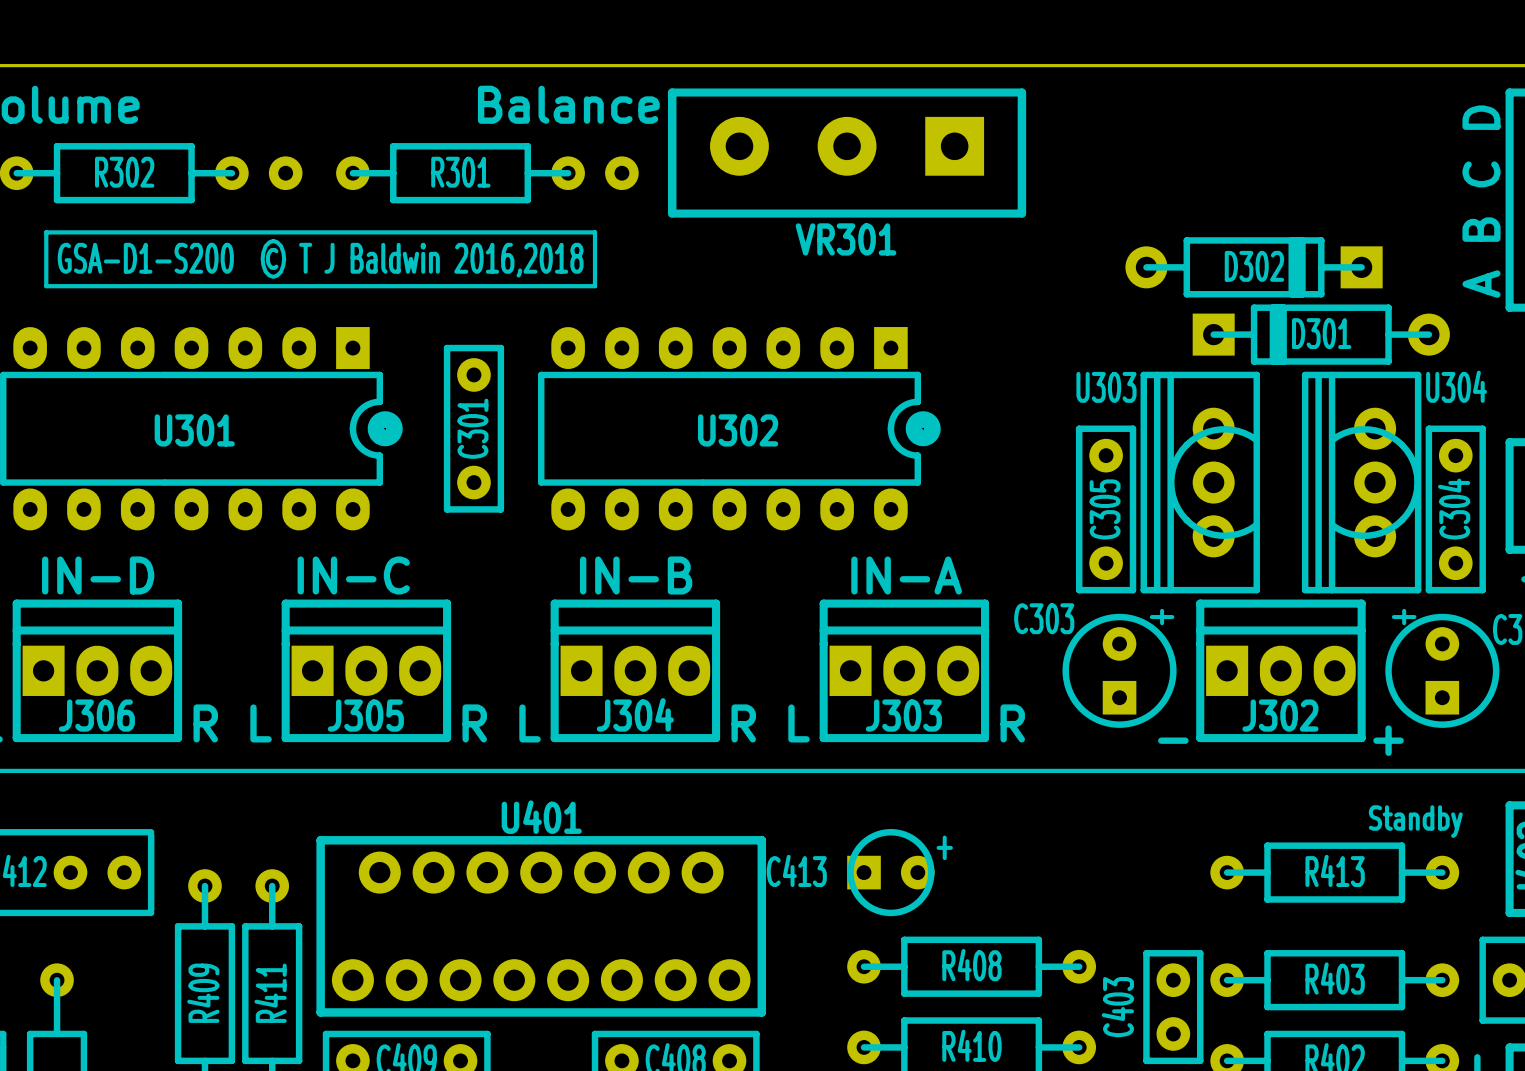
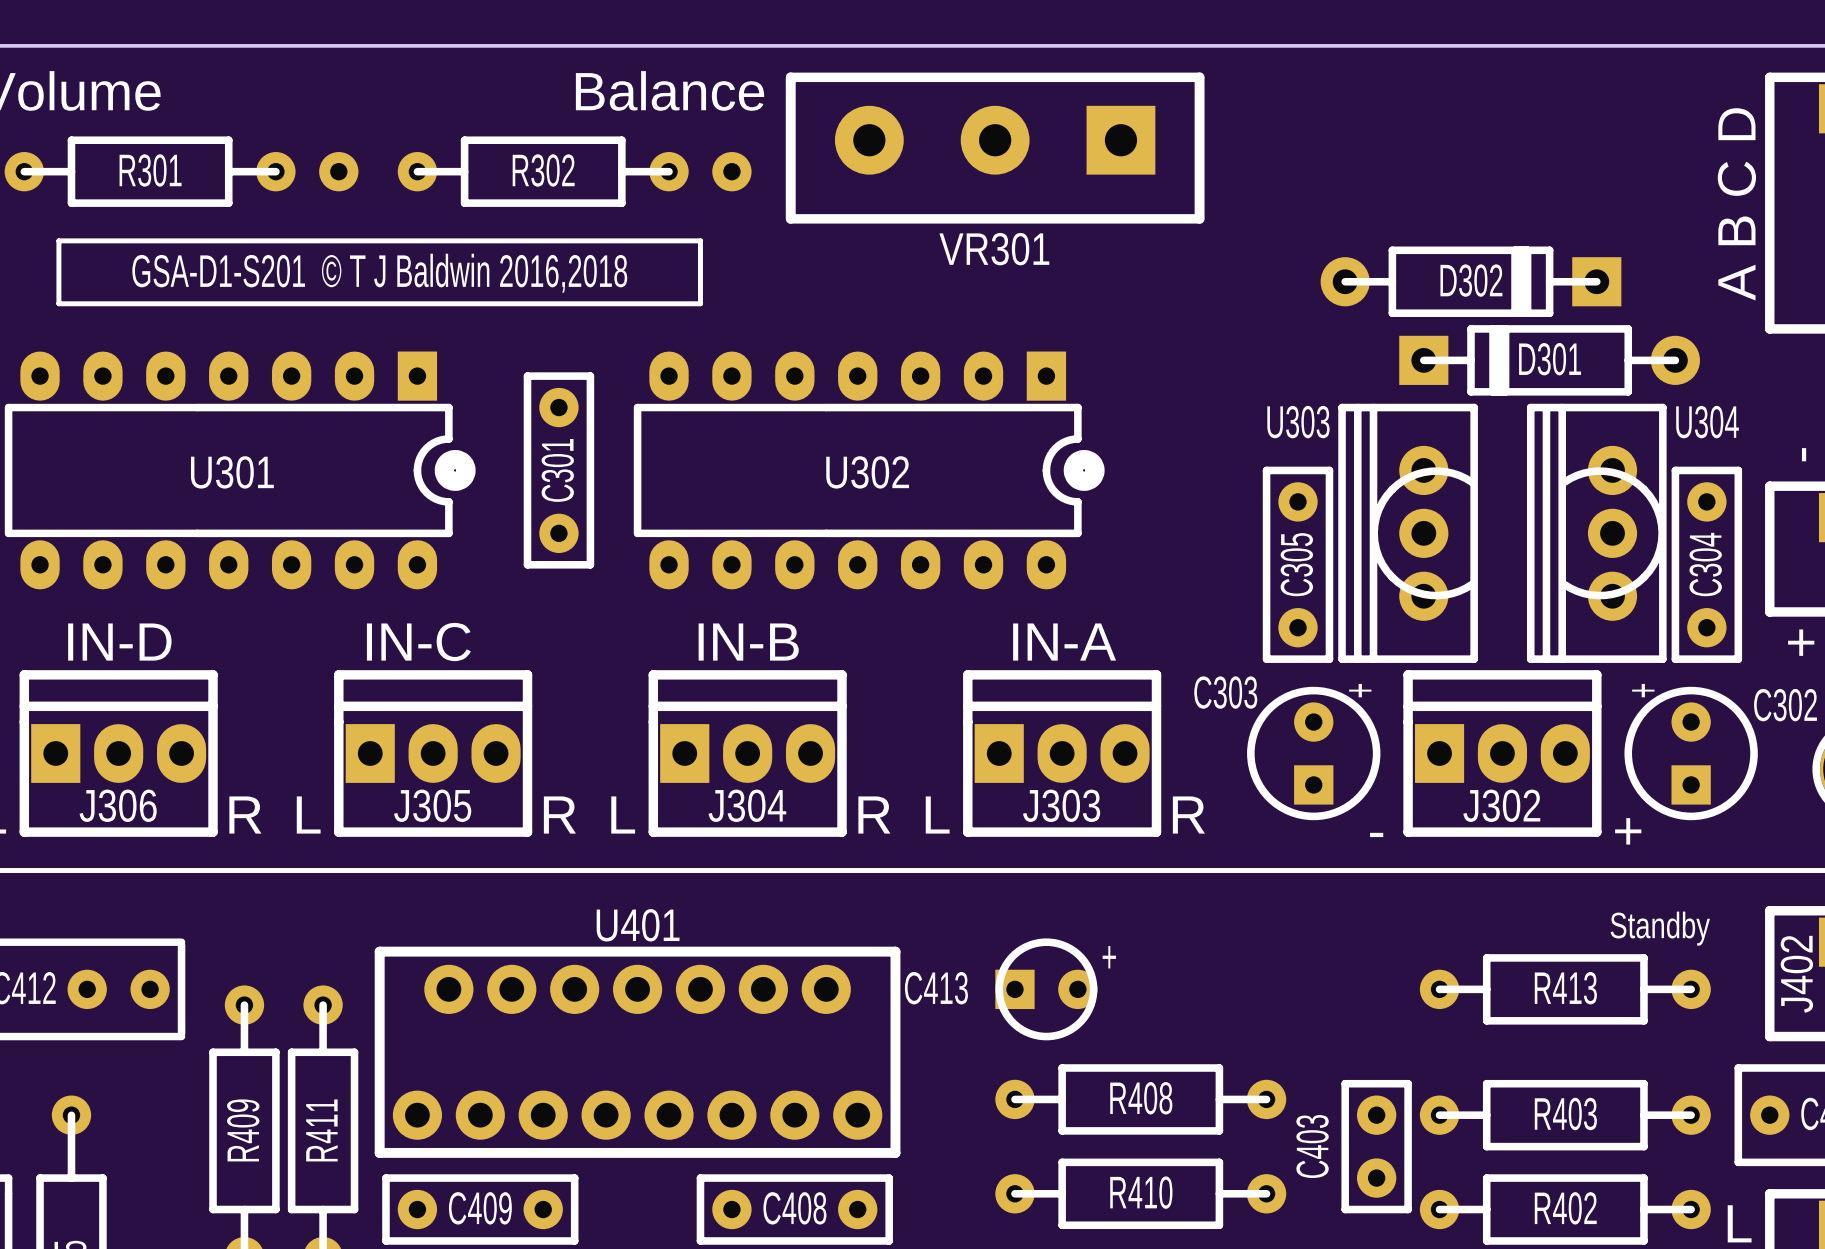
R302 name: R302 (124, 172) -> R301 (150, 170)
R301 name: R301 (460, 172) -> R302 (543, 170)
text: GSA-D1-S200 © T J Baldwin 2016,2018 (320, 258) -> GSA-D1-S201 © T J Baldwin 2016,2018 (379, 273)

